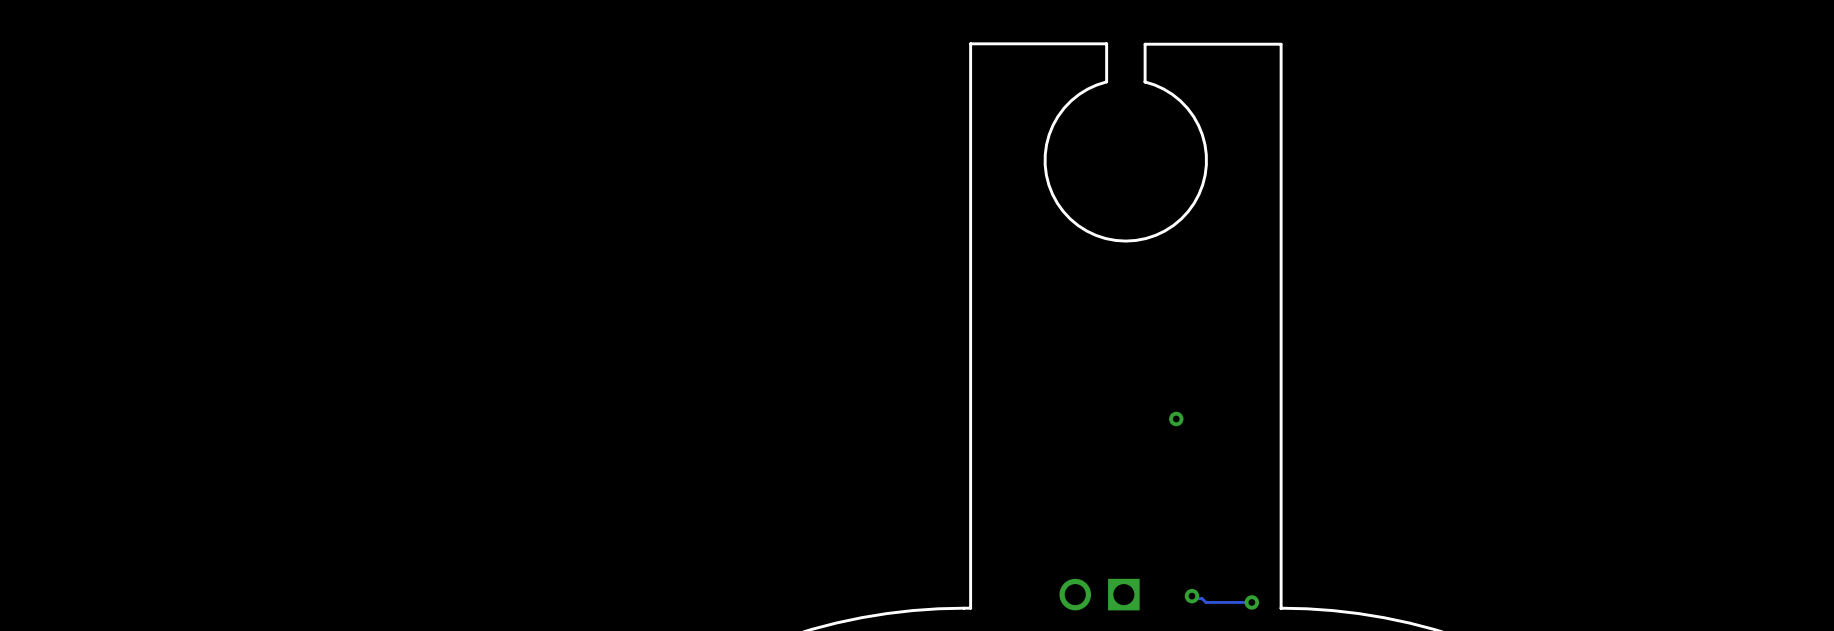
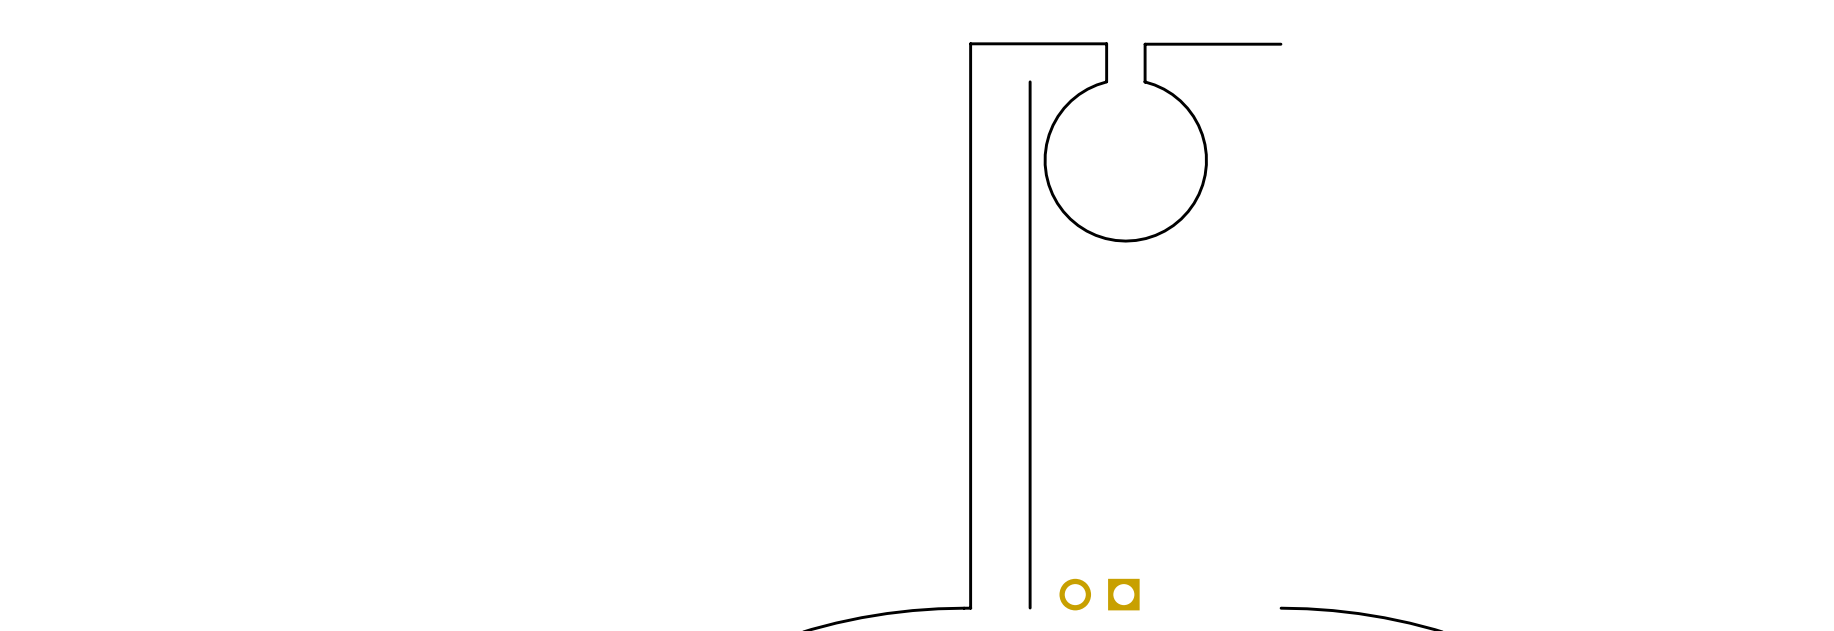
board edge: (1281, 44) (1281, 608) -> none
board edge: none -> (1030, 81) (1030, 608)
via: (1176, 418) -> none
track: (1191, 596) (1194, 598) (1202, 598) (1205, 602) (1251, 602) -> none
via: (1191, 596) -> none
via: (1251, 602) -> none

